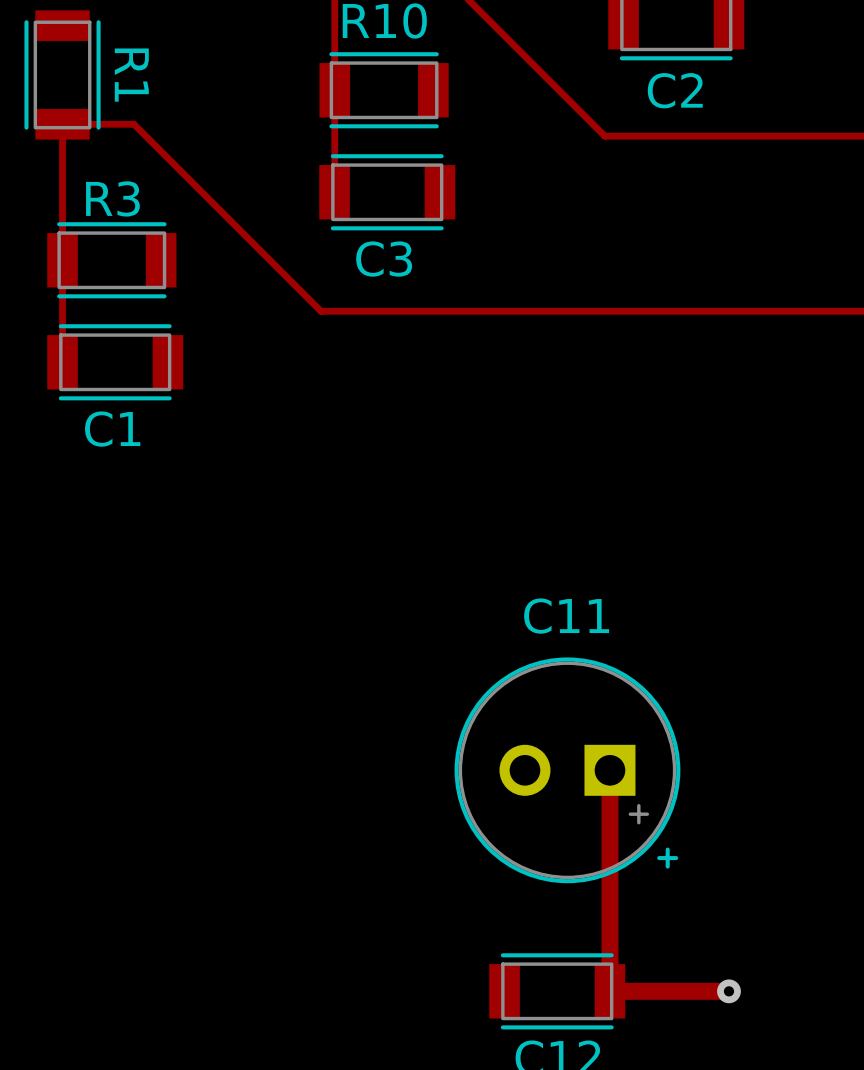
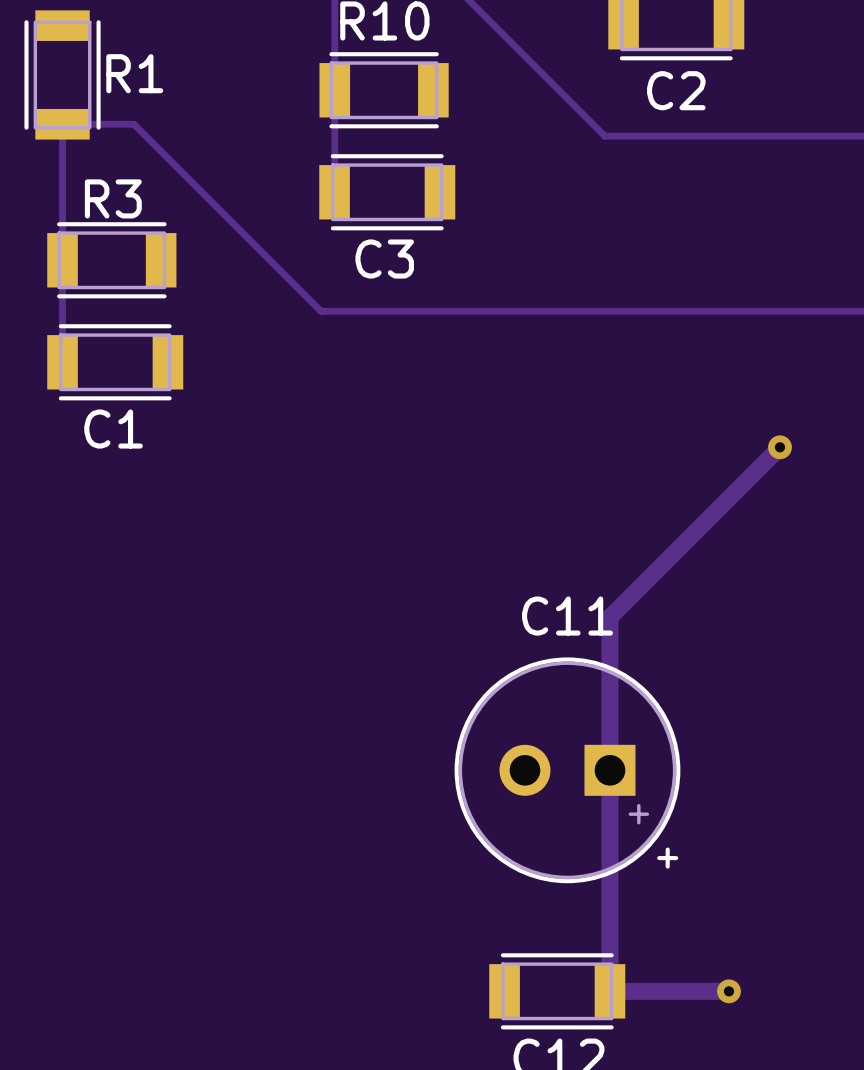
R1 name rotation: 0° (131, 75) -> 90° counterclockwise (134, 73)
track: none -> (779, 447) (609, 617) (609, 770)
via: none -> (779, 447)

